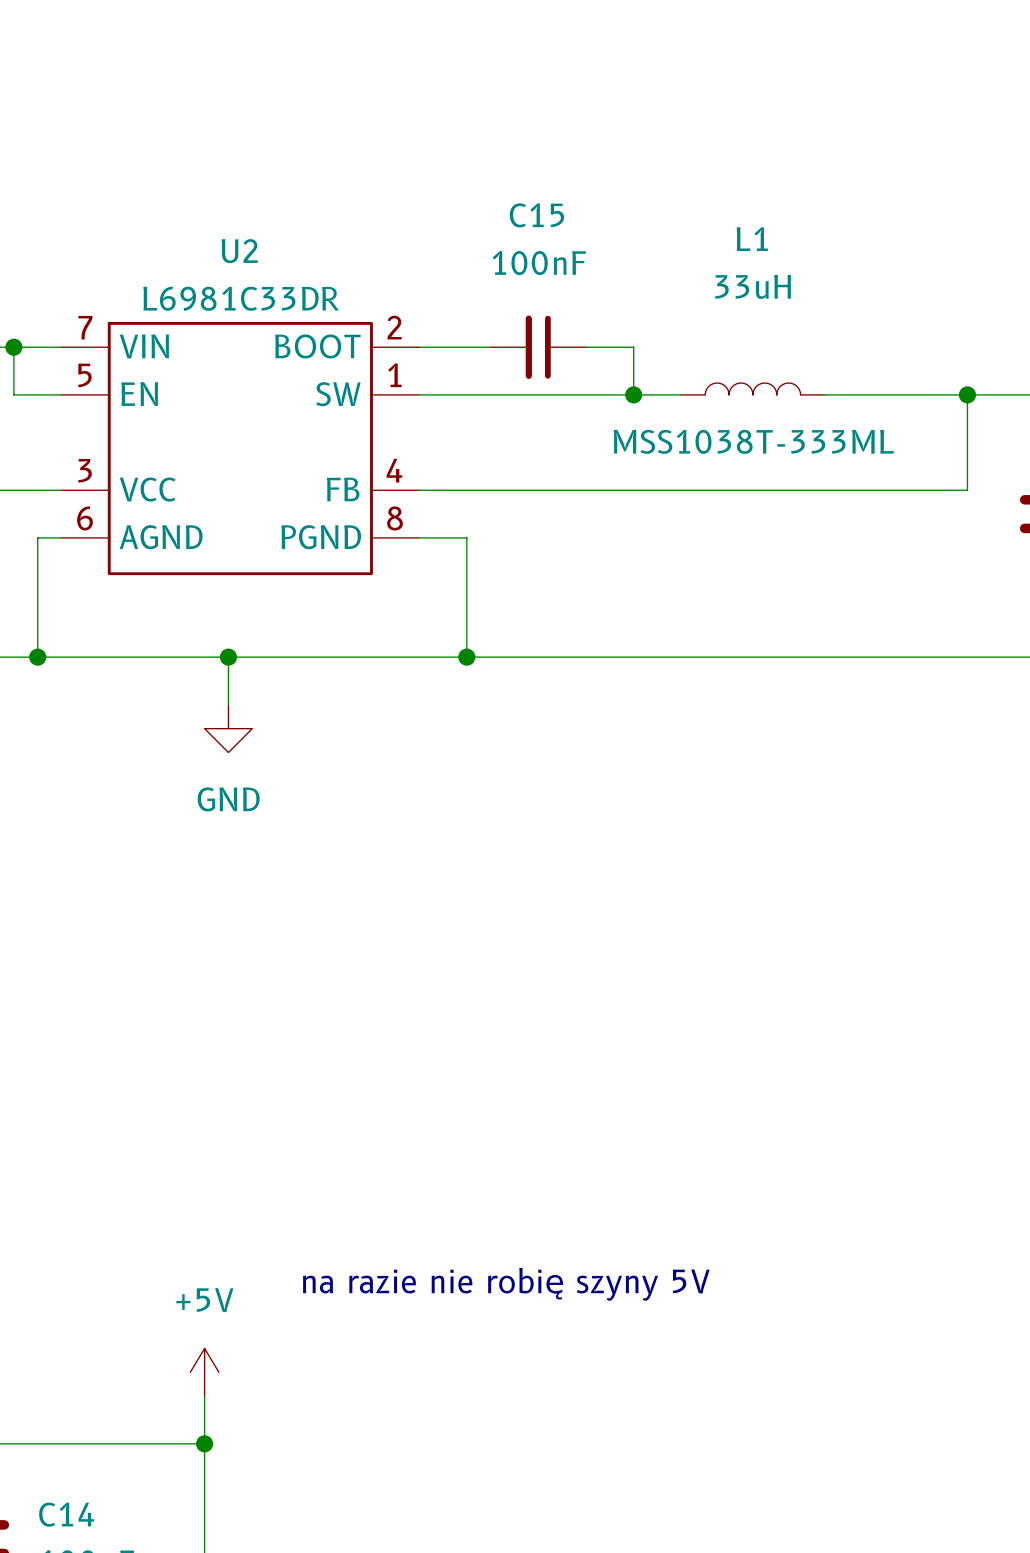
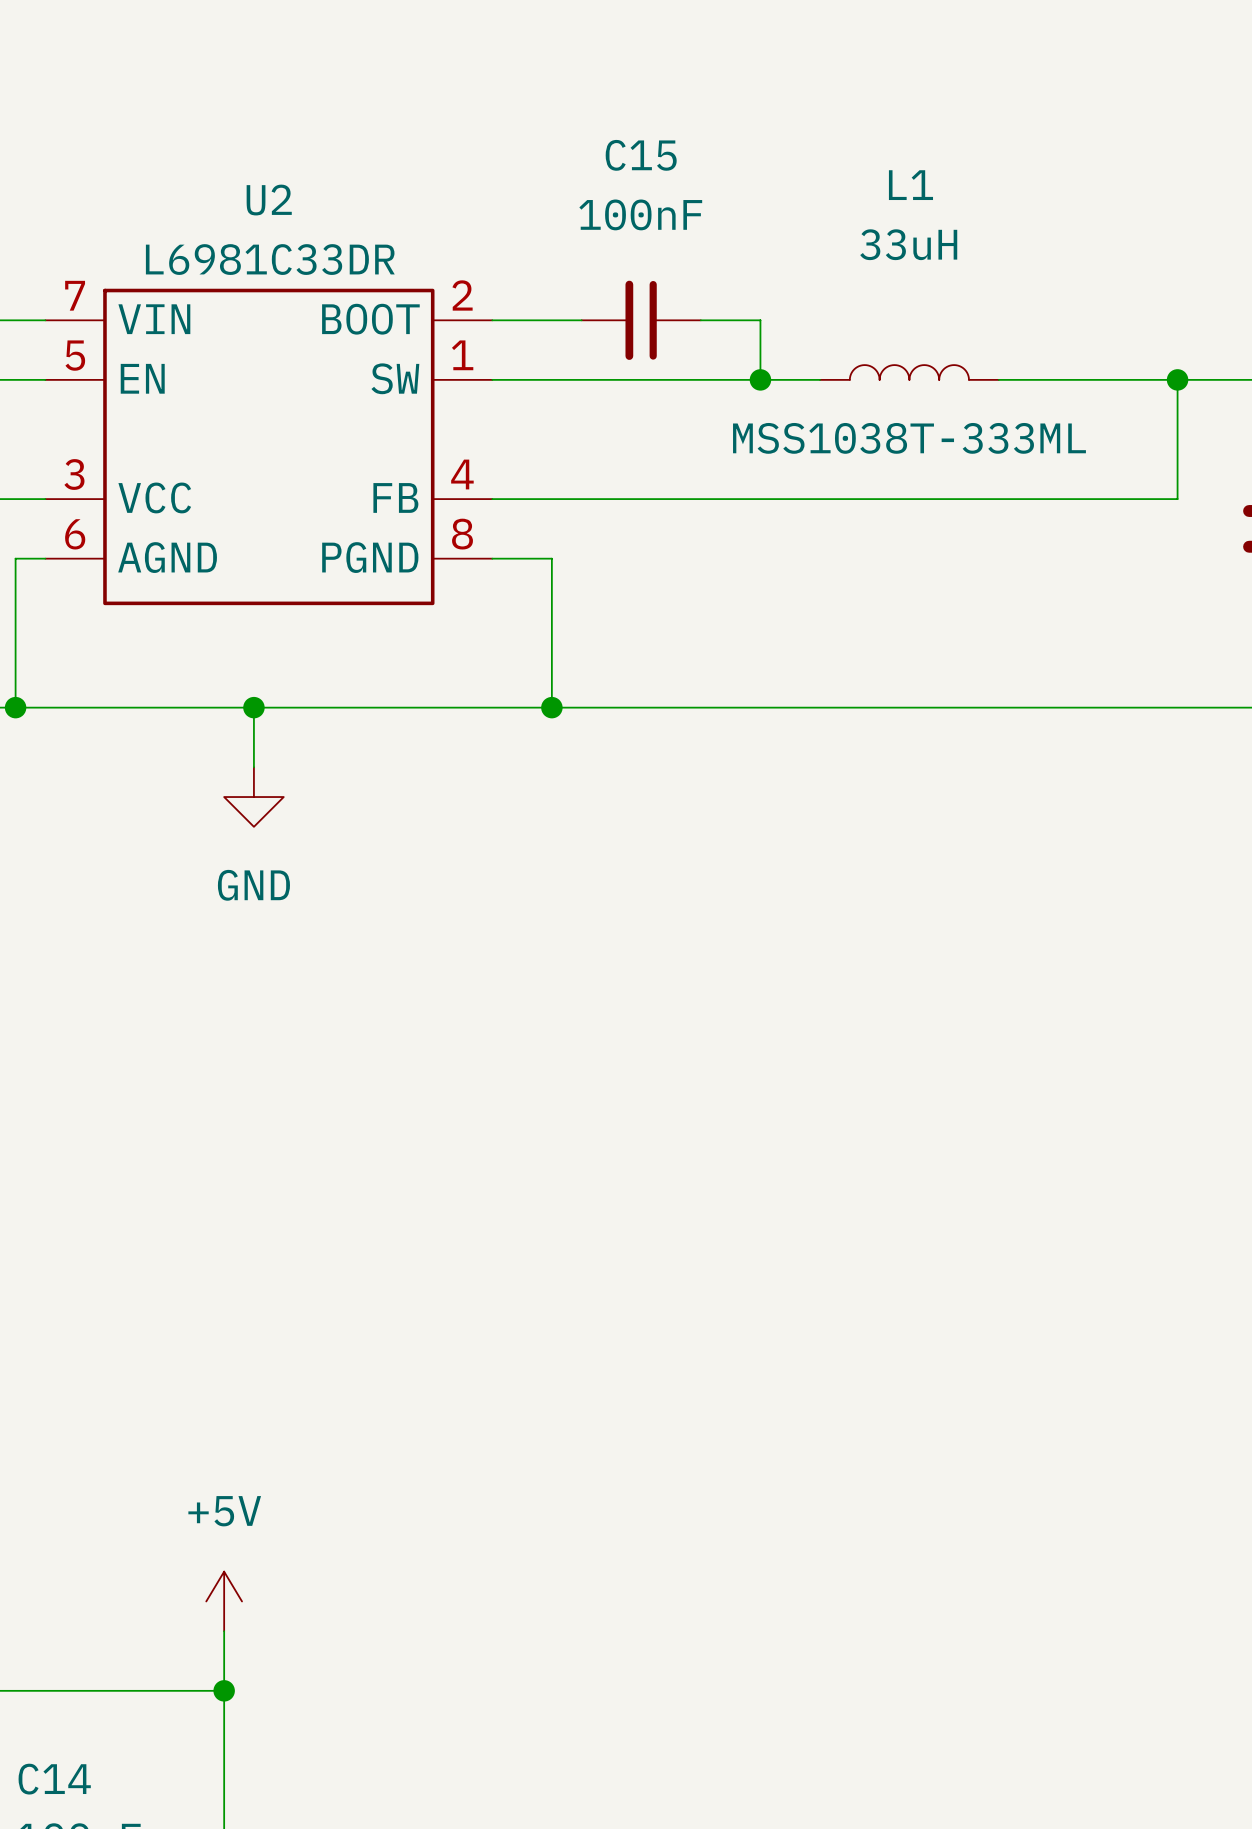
text: na razie nie robię szyny 5V (506, 1284) -> none

